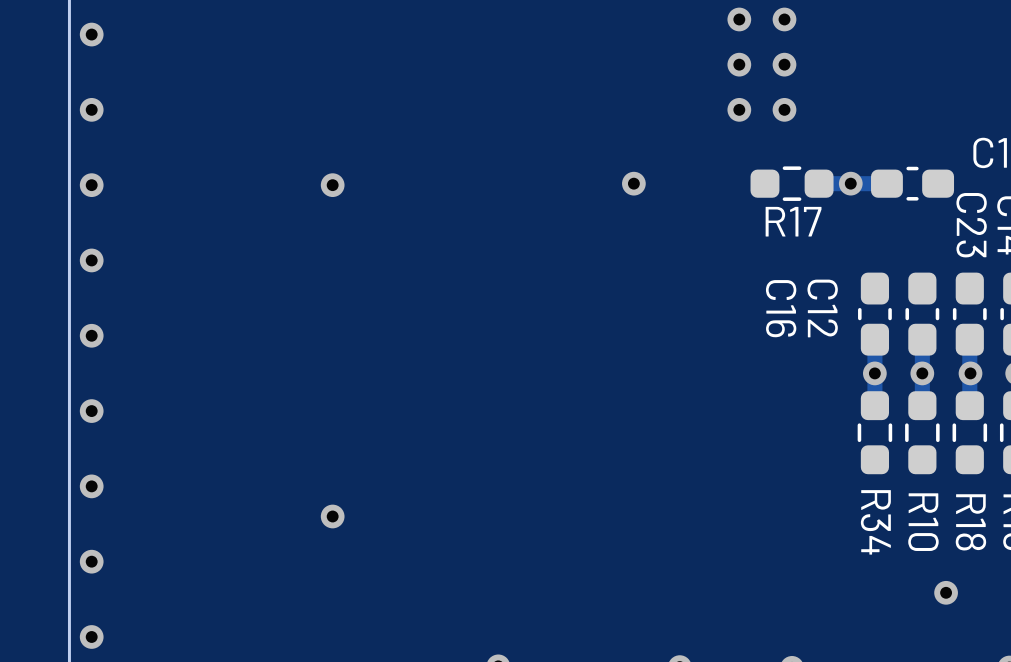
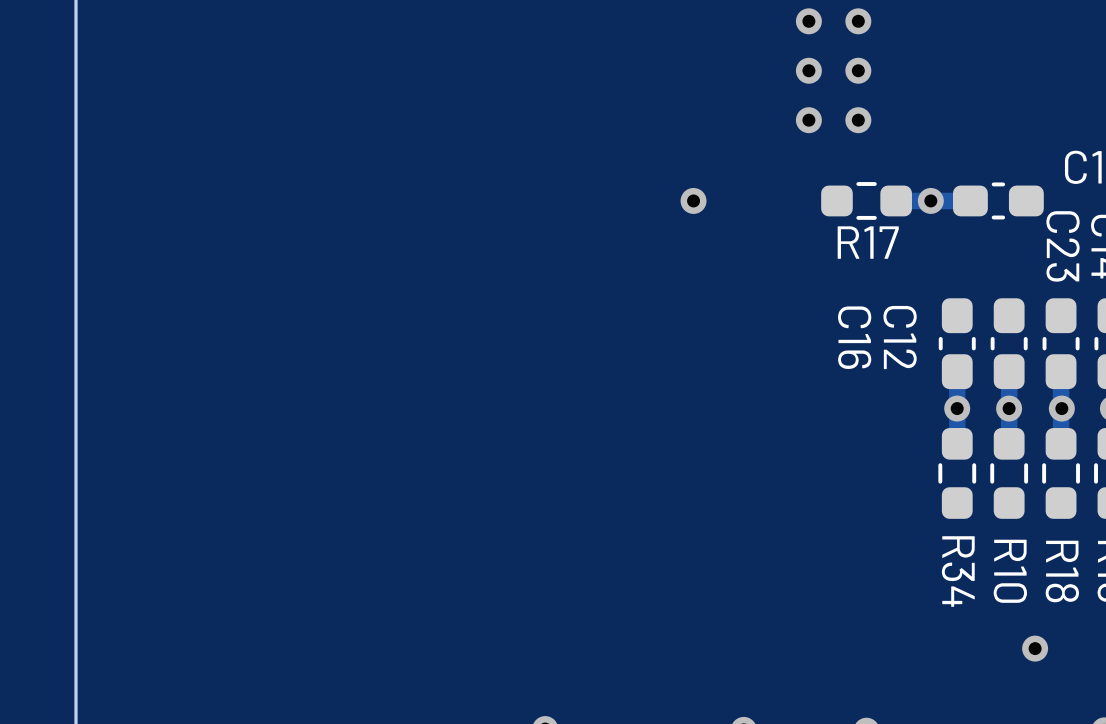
via: (91, 34) -> none
via: (91, 109) -> none
via: (91, 185) -> none
via: (332, 185) -> none
via: (91, 260) -> none
via: (91, 335) -> none
via: (91, 411) -> none
via: (91, 486) -> none
via: (332, 516) -> none
via: (91, 561) -> none
via: (91, 636) -> none

